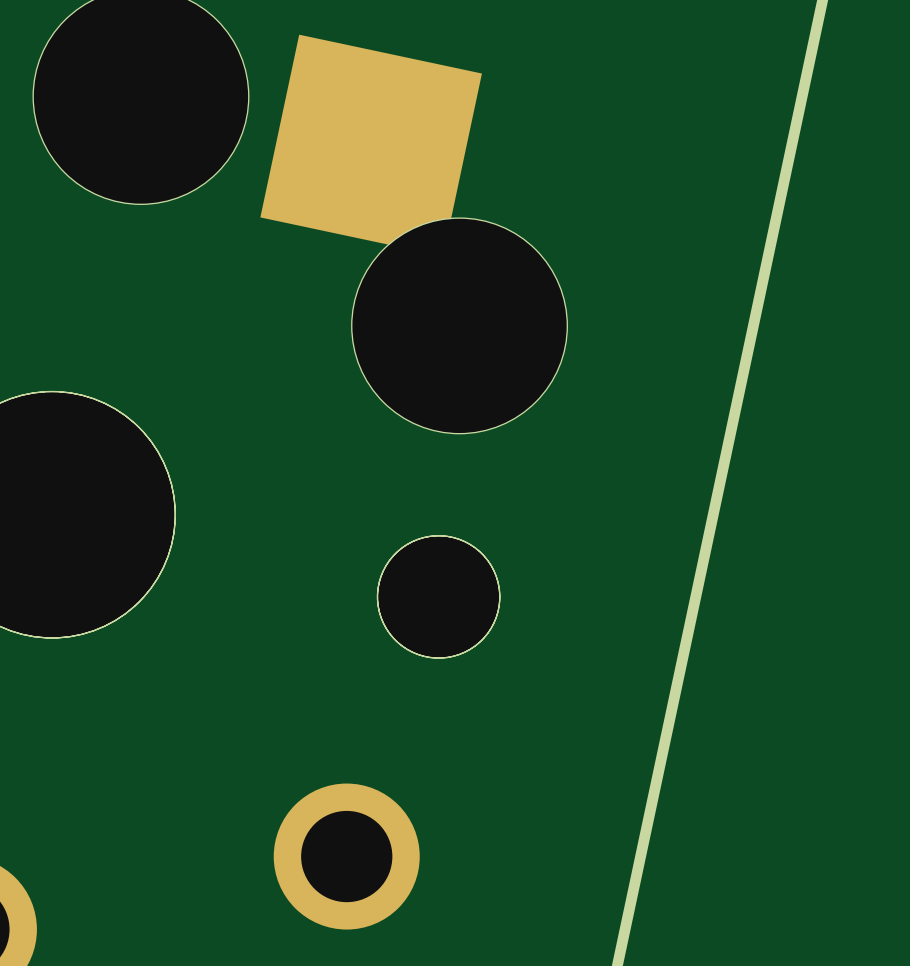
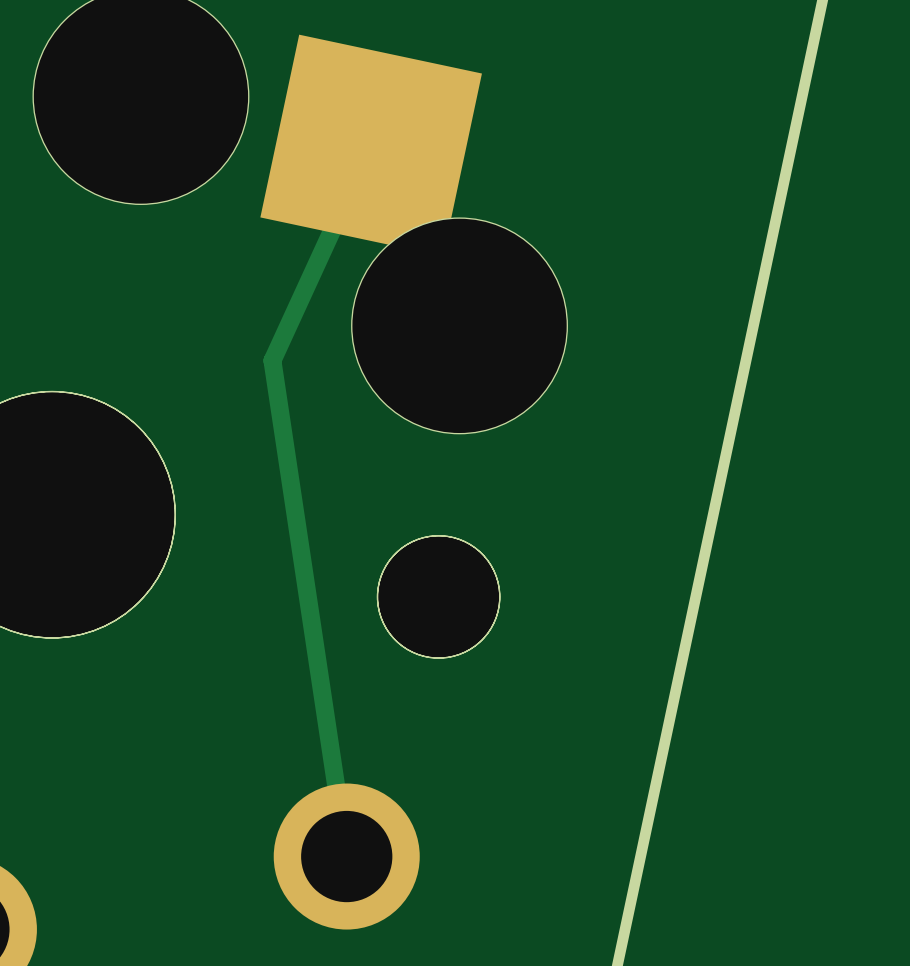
track: none -> (371, 145) (272, 360) (346, 856)

